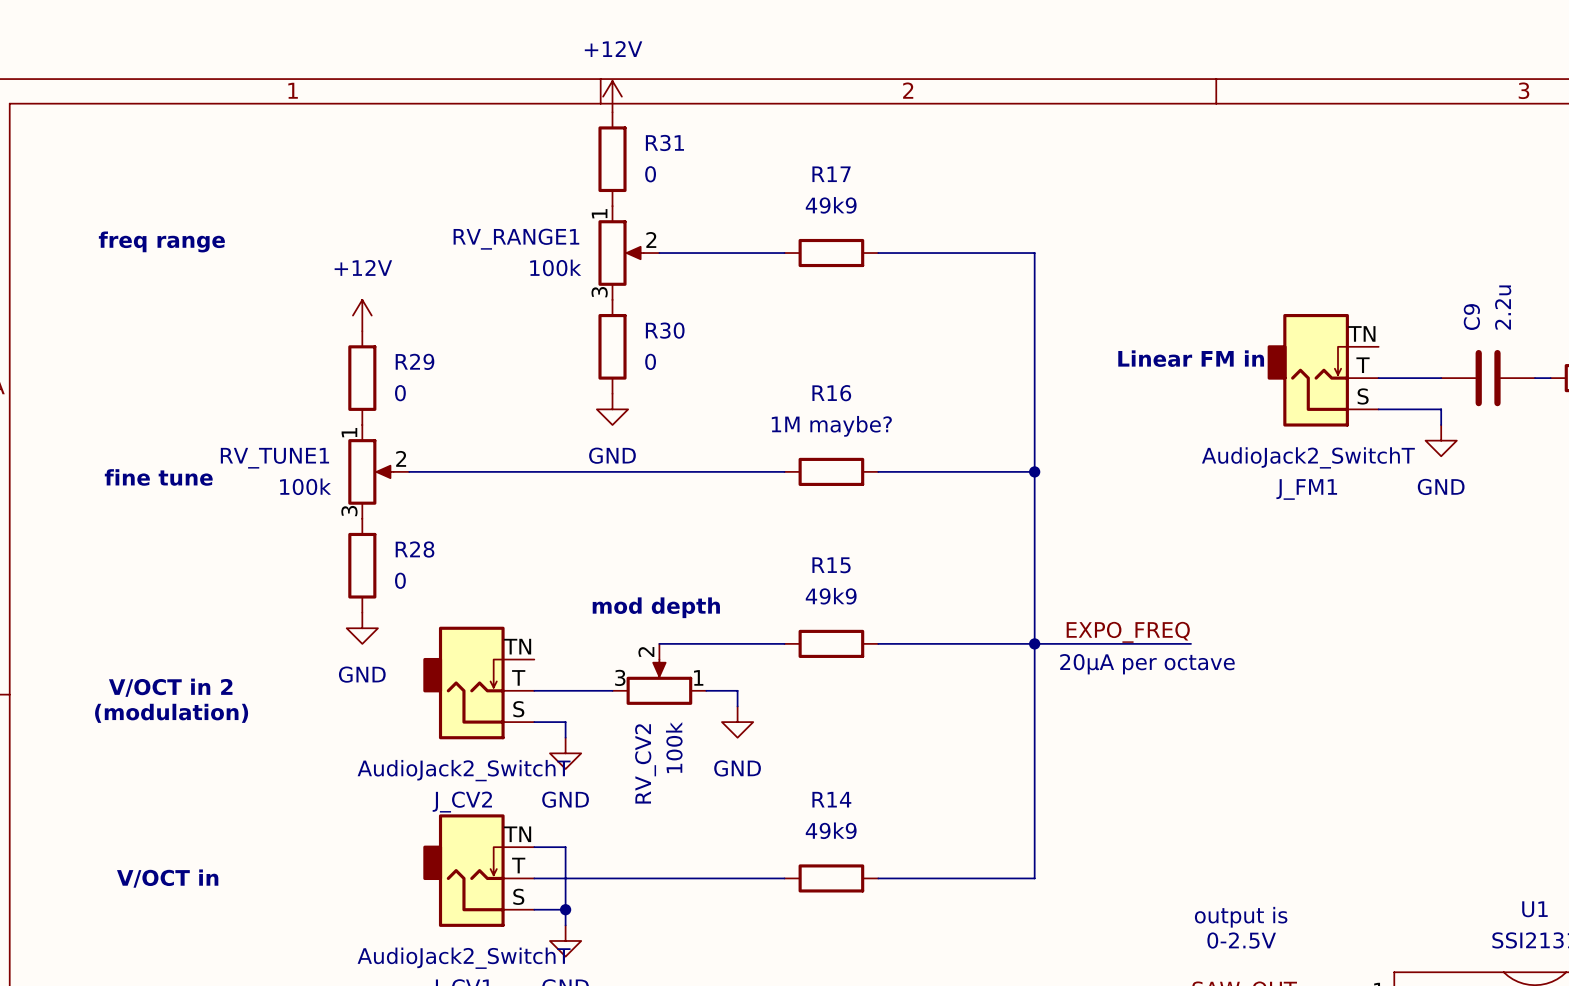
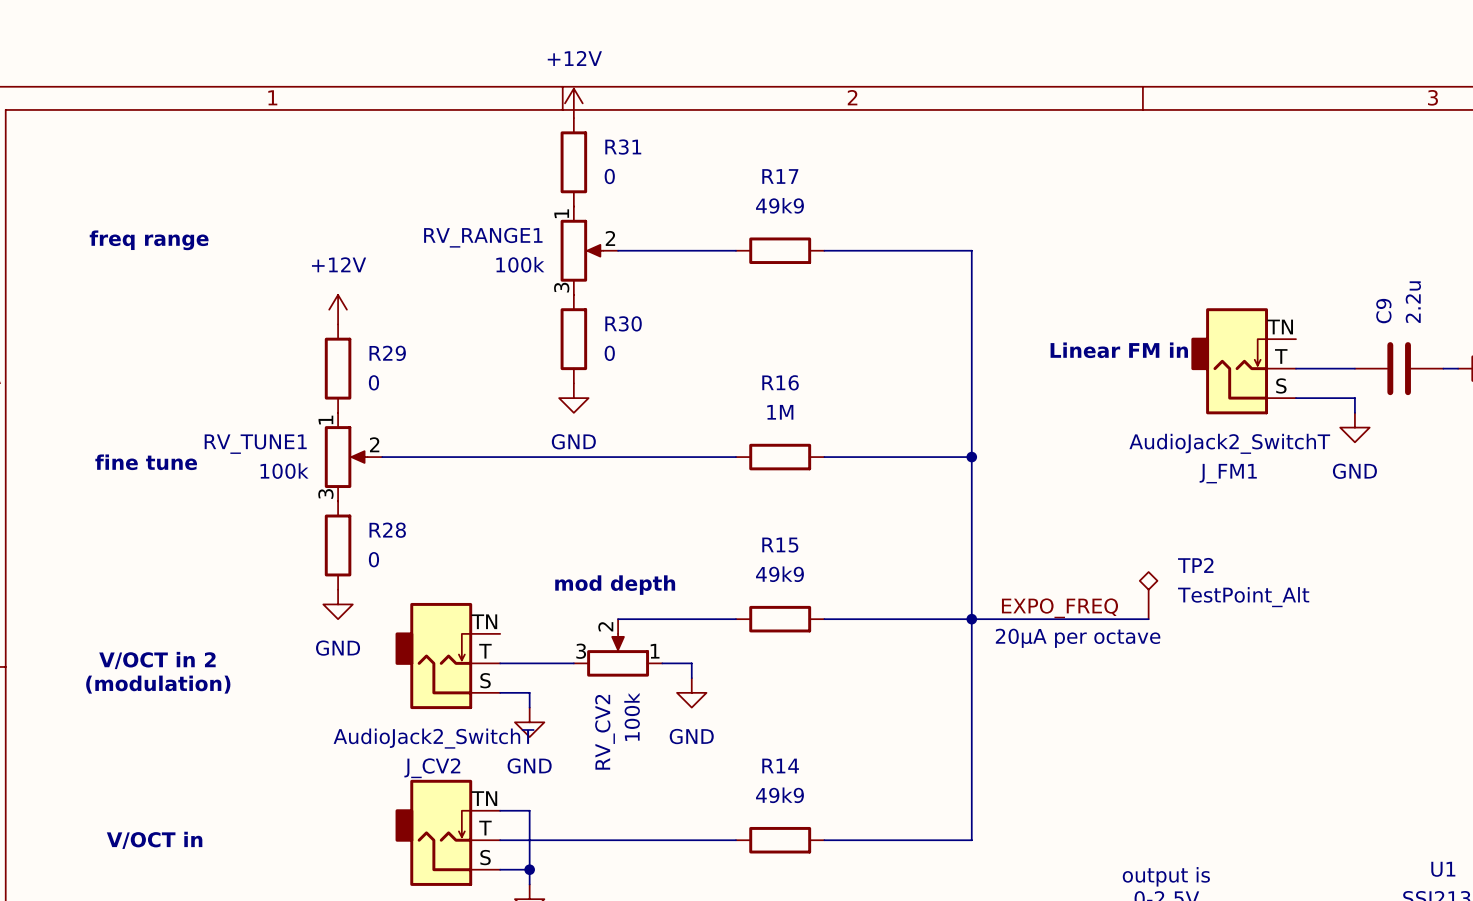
R16 value: 1M maybe? (831, 426) -> 1M (780, 412)
TP2: none -> TestPoint_Alt (1148, 595)
wire: none -> (1119, 619) (1148, 619)

